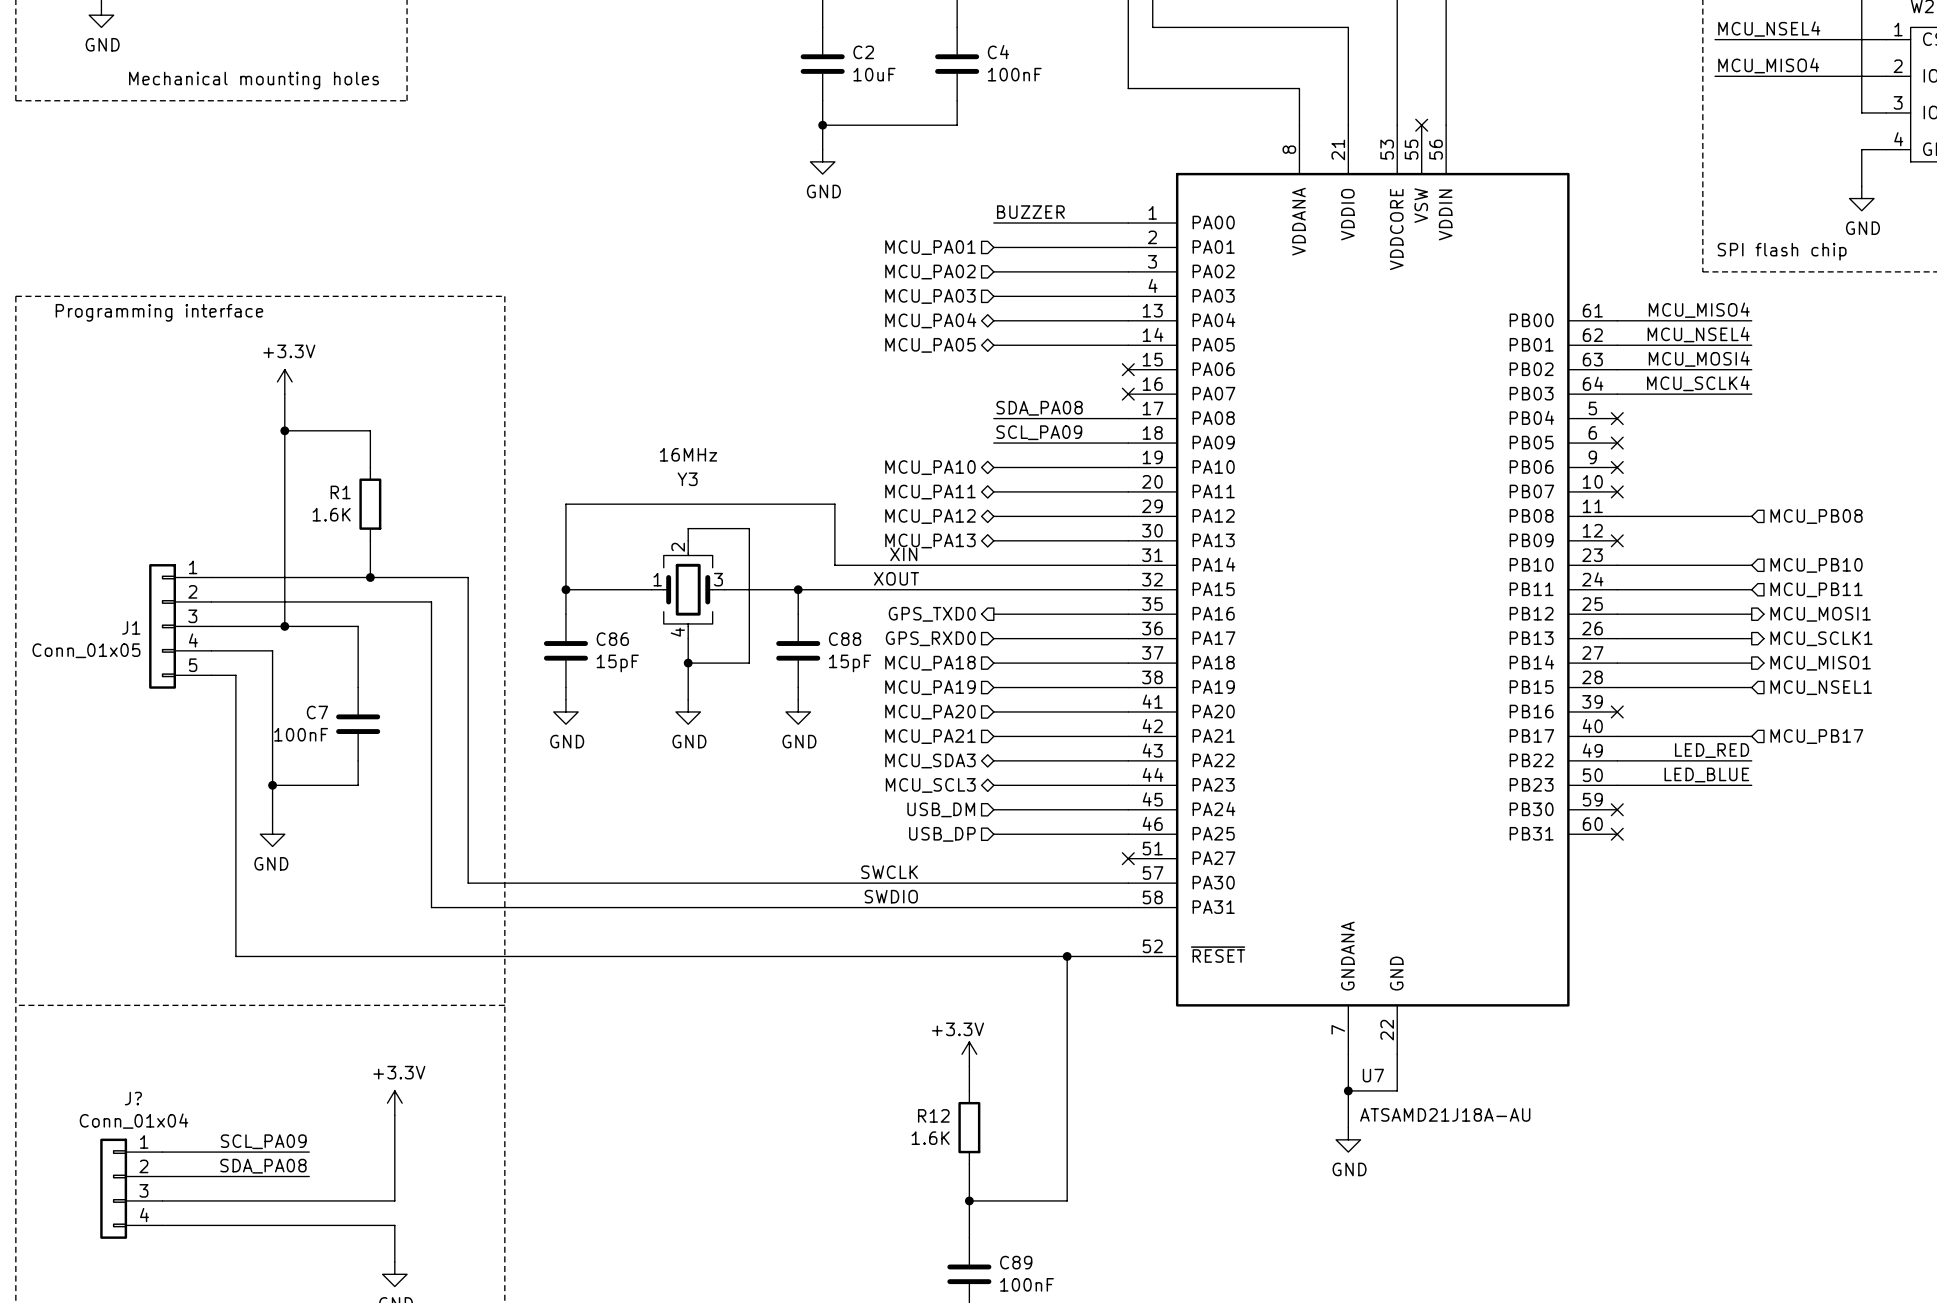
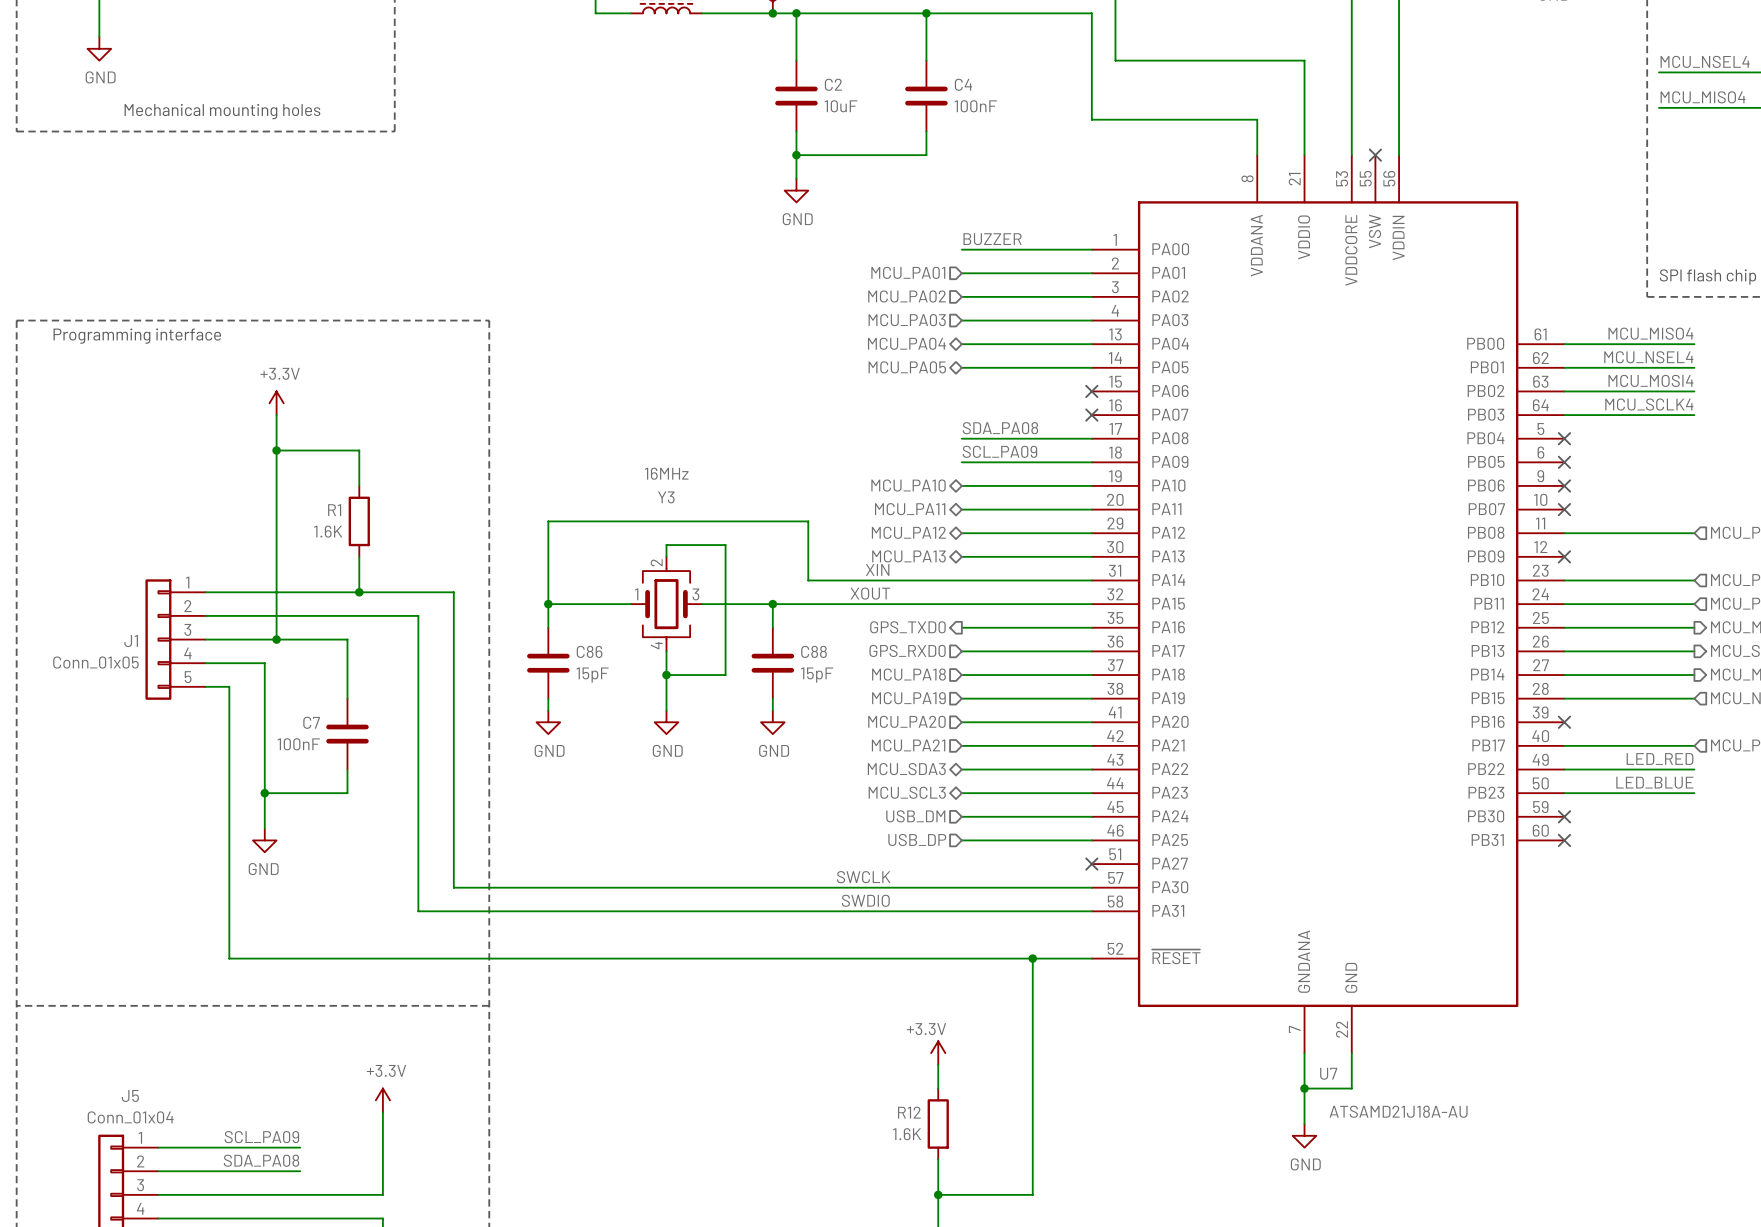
J? name: J? (133, 1098) -> J5 (130, 1095)

